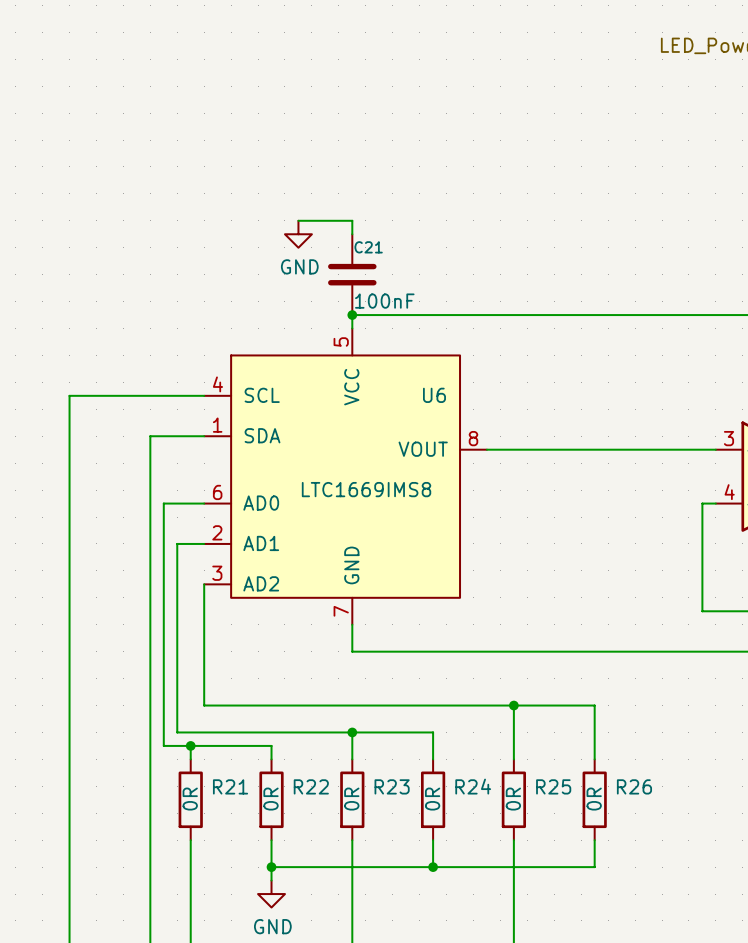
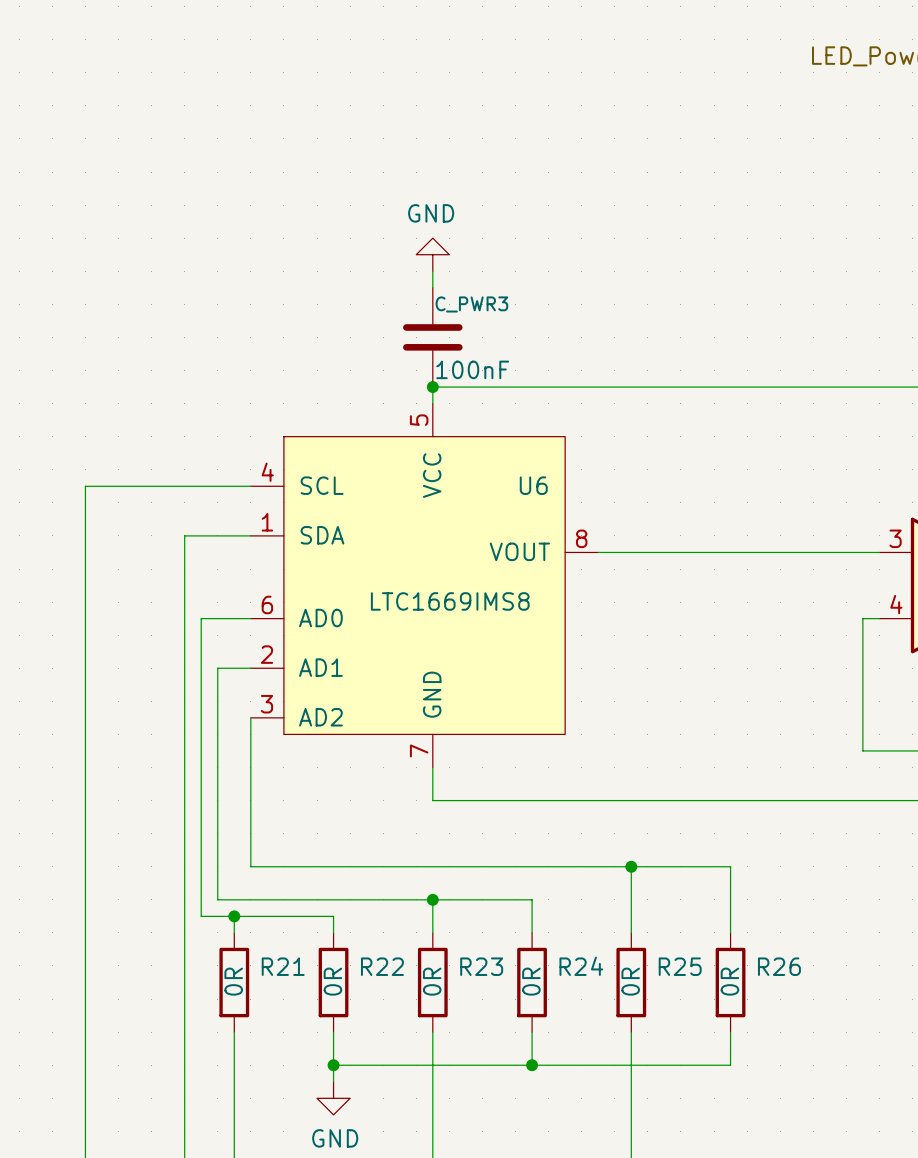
wire: (298, 220) (352, 220) -> none
power symbol rotation: 0° (298, 234) -> 180° (432, 254)
power symbol position: GND (298, 234) -> GND (432, 254)
C21 name: C21 (368, 247) -> C_PWR3 (471, 304)

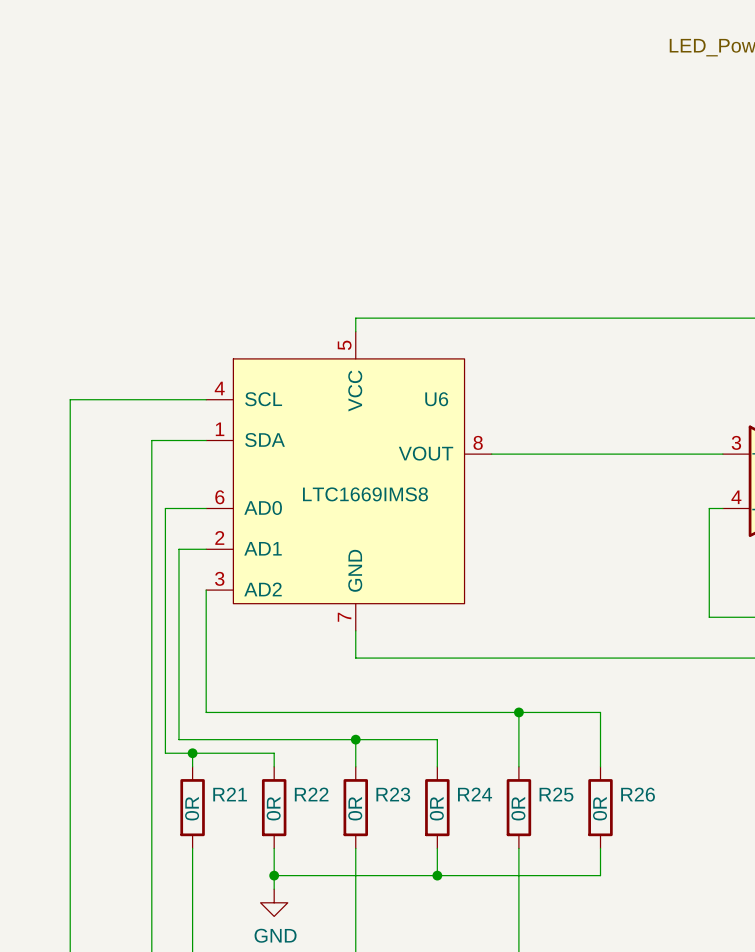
power symbol: GND (432, 254) -> none
wire: (432, 271) (432, 287) -> none
C_PWR3: 100nF (432, 337) -> none
junction: (432, 387) -> none

